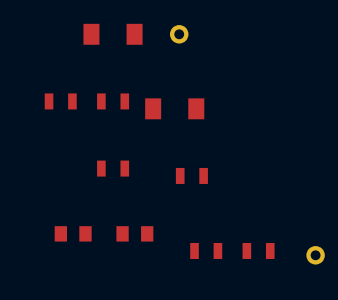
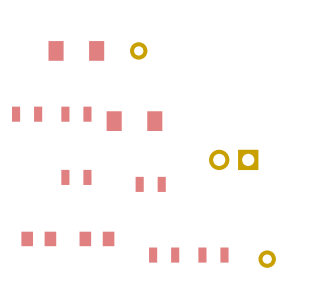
part: none -> (233, 159)

